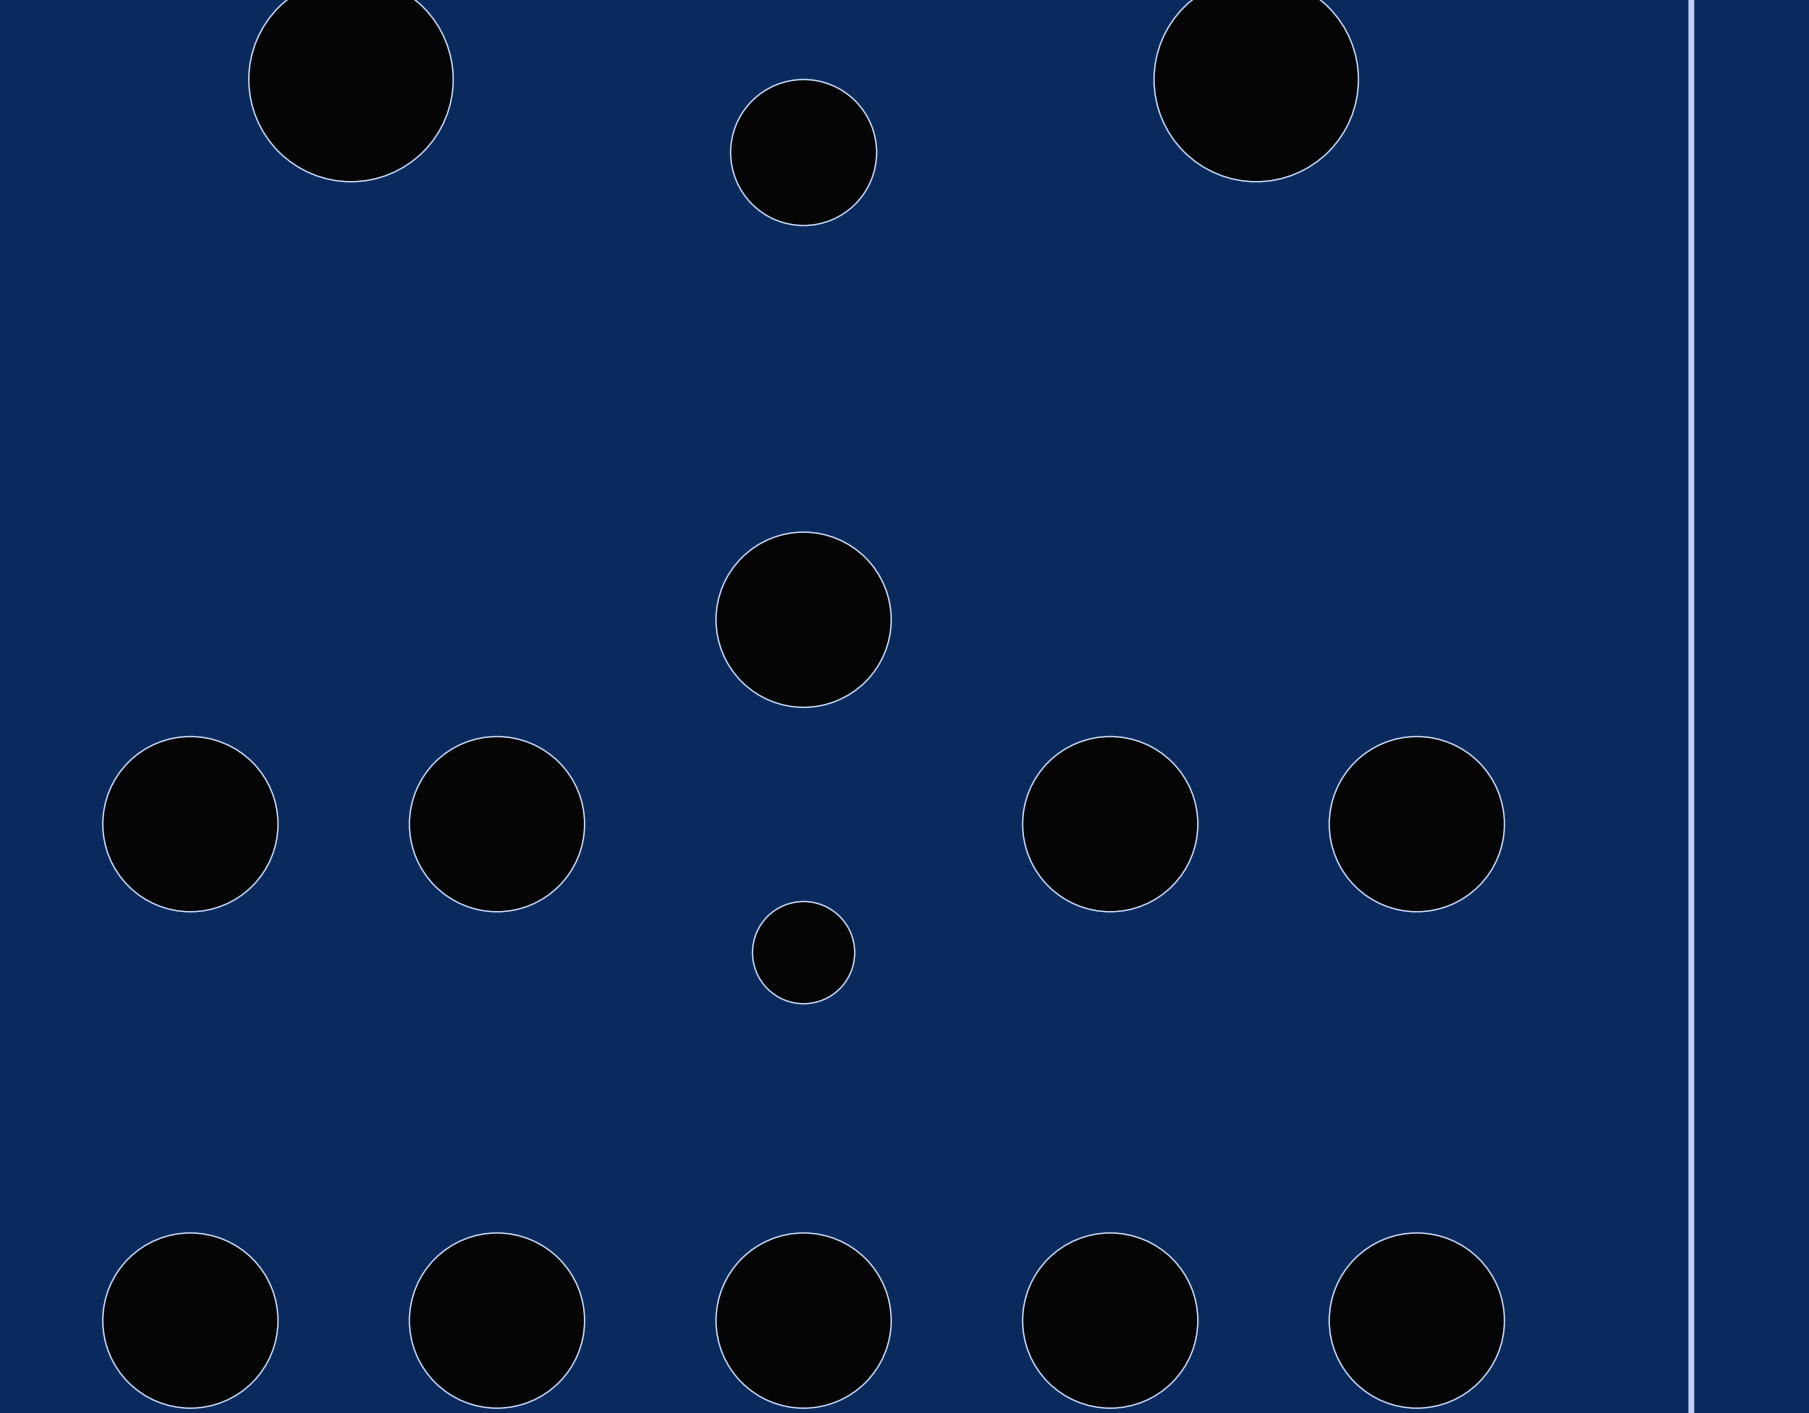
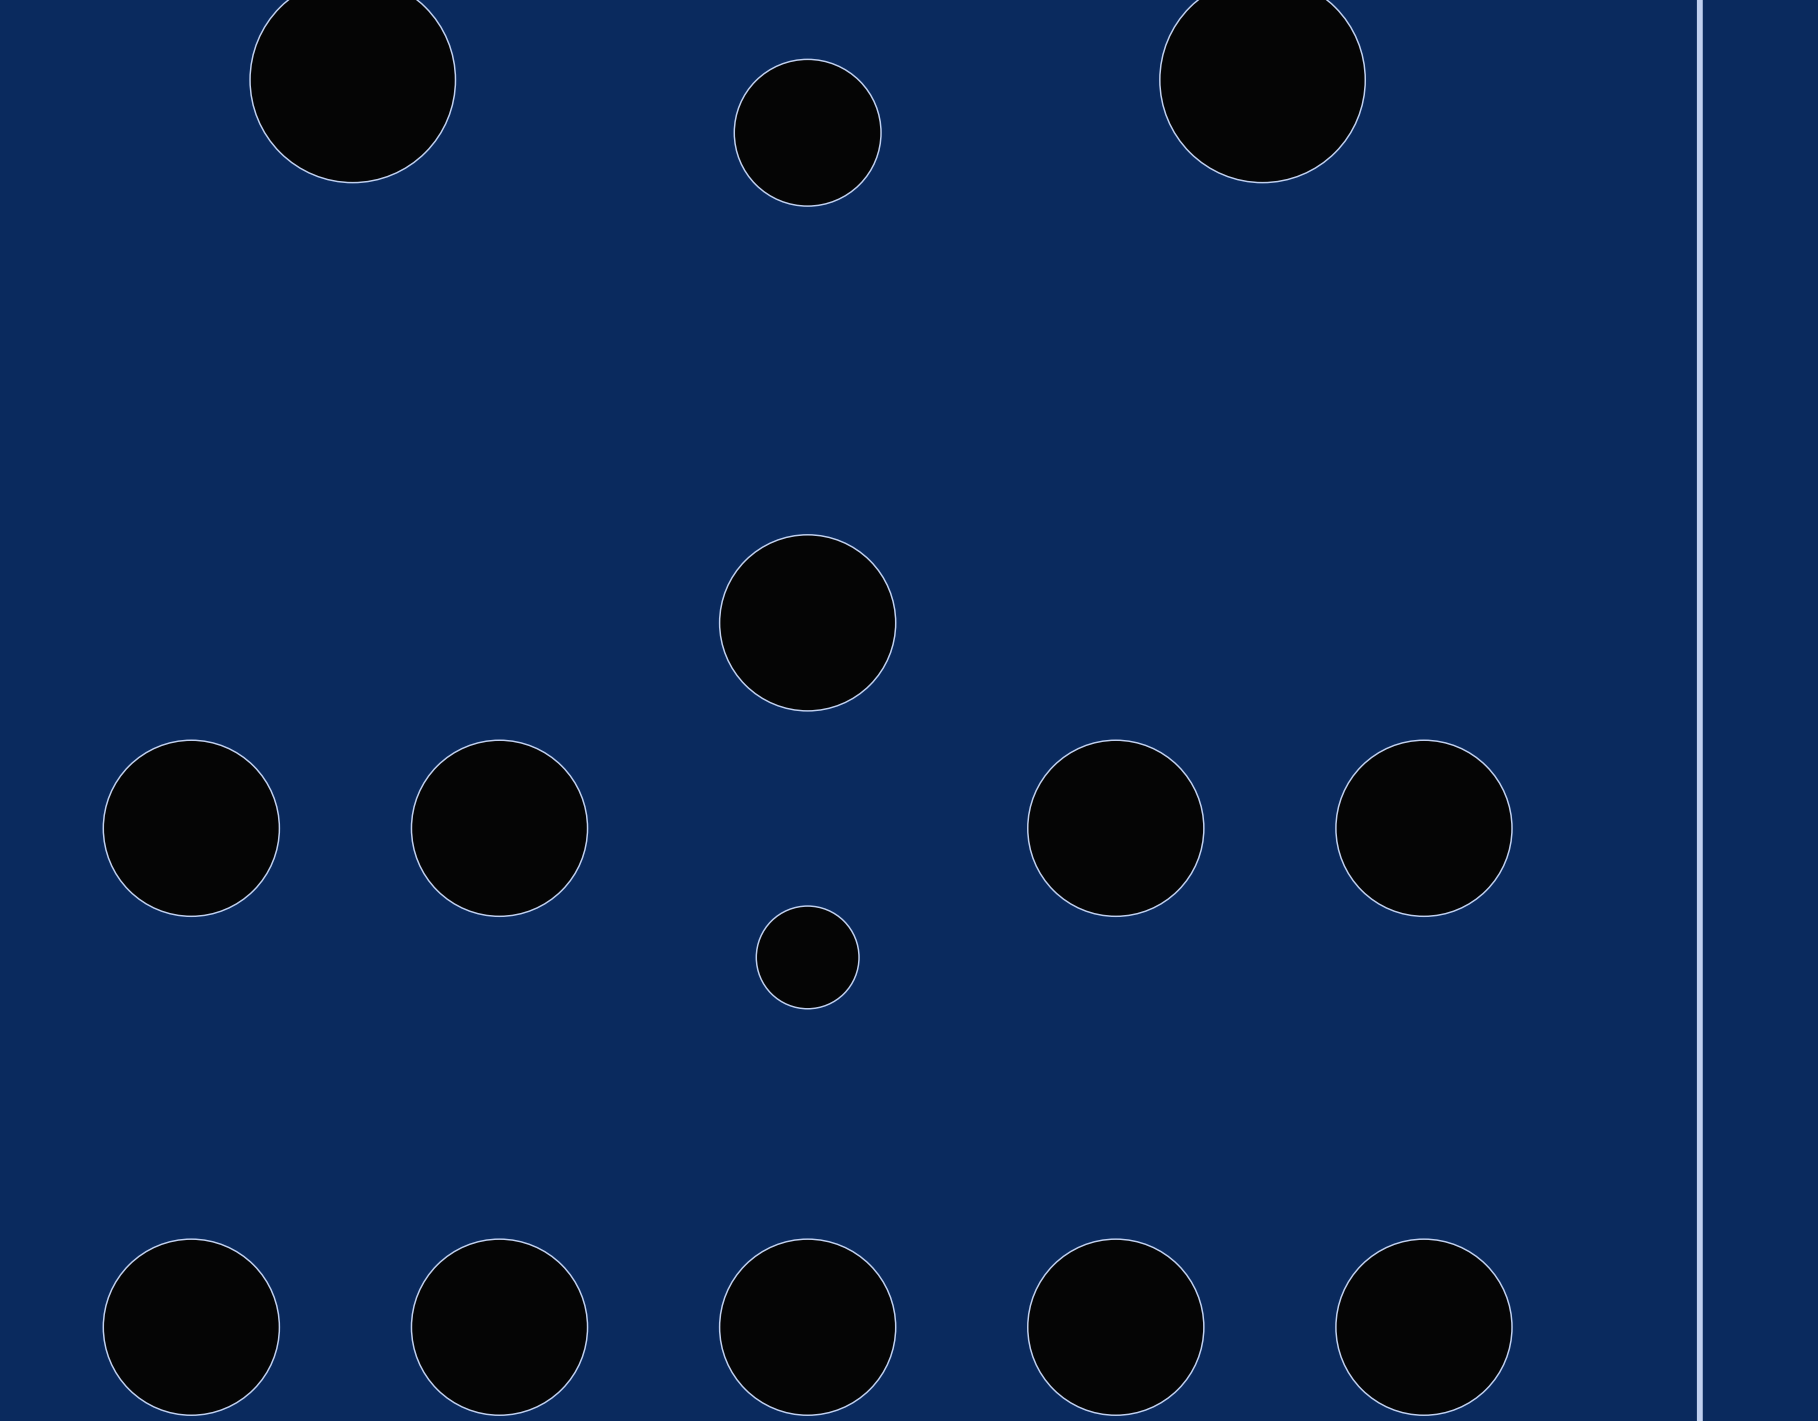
part position: (803, 152) -> (807, 132)

